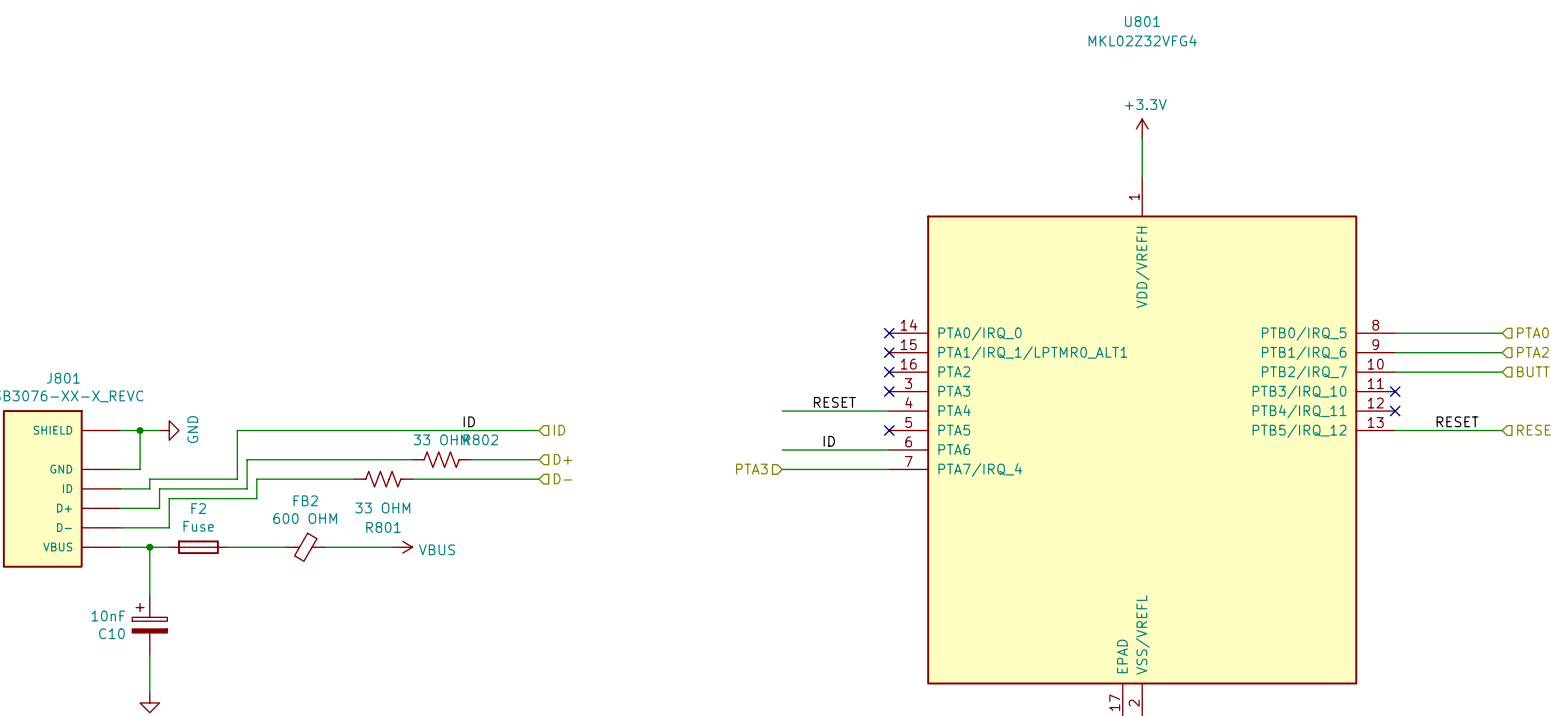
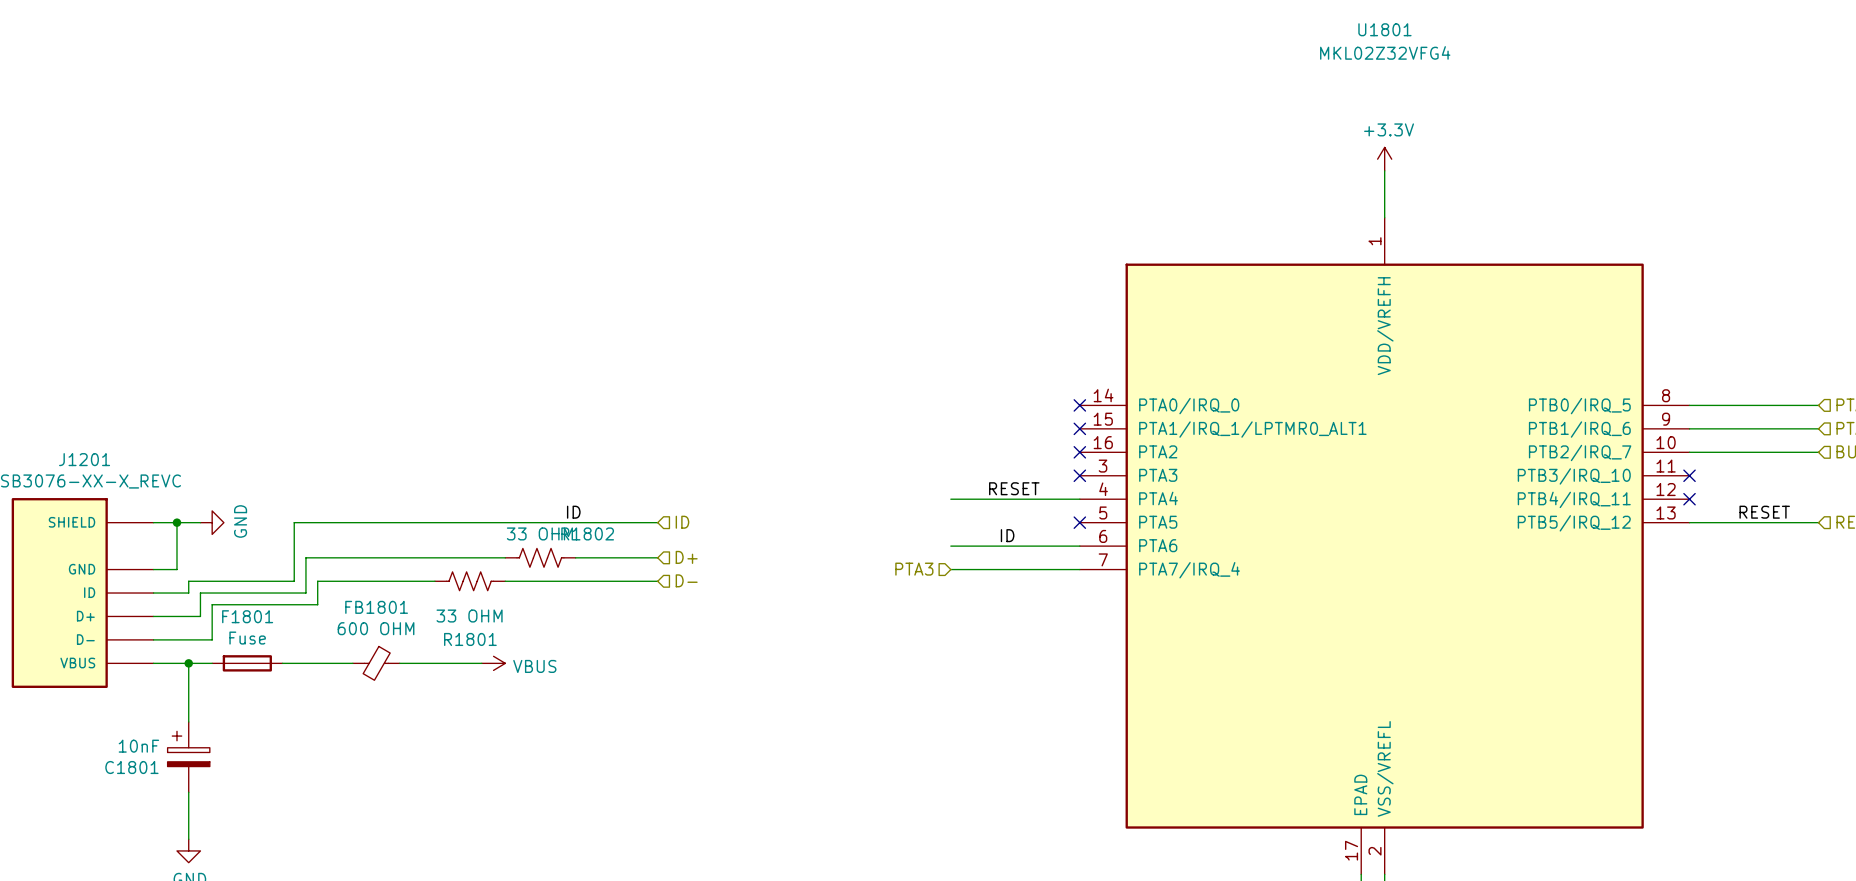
U801 name: U801 (1142, 21) -> U1801 (1384, 29)
J801 name: J801 (63, 378) -> J1201 (84, 459)
R802 name: R802 (480, 439) -> R1802 (587, 533)
FB2 name: FB2 (305, 500) -> FB1801 (376, 607)
F2 name: F2 (198, 508) -> F1801 (247, 616)
R801 name: R801 (383, 527) -> R1801 (470, 639)
C10 name: C10 (111, 633) -> C1801 (131, 767)

